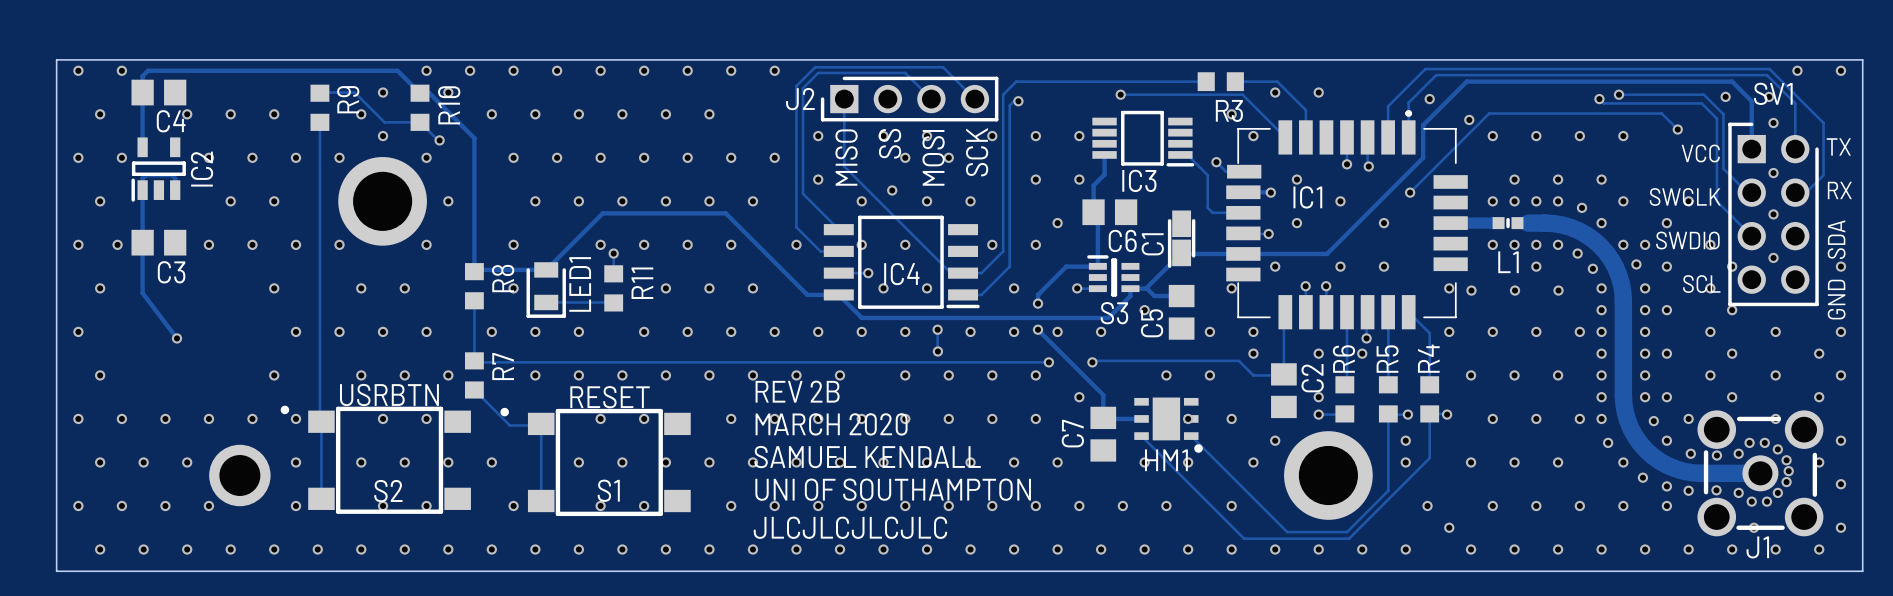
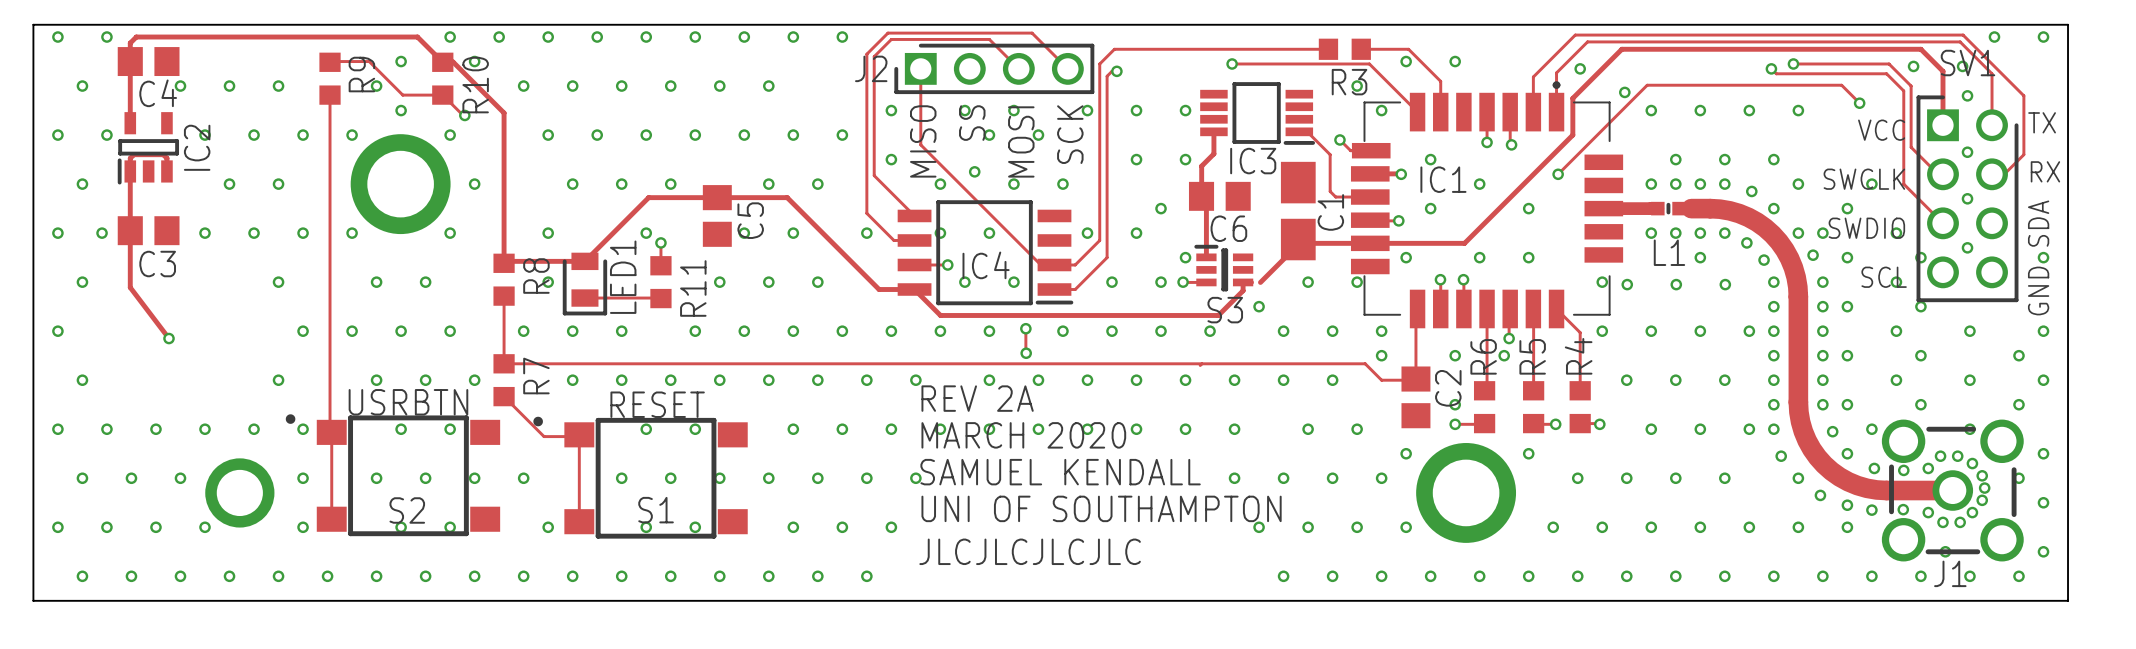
via: (665, 201) -> none
C1 footprint: [1167, 210, 1196, 268] -> [1280, 161, 1316, 261]
via: (644, 244) -> none
C1 name position: C1 (1152, 244) -> C1 (1330, 212)
via: none -> (1185, 257)
track: (1097, 266) (1066, 266) (1038, 294) (1038, 303) -> none
via: none -> (1161, 282)
track: (1137, 288) (1147, 288) (1154, 296) (1181, 296) -> none
via: none -> (1308, 282)
via: (1038, 303) -> none
C5 position: (1181, 312) -> (717, 215)
C5 name position: C5 (1152, 323) -> C5 (750, 220)
track: (1038, 329) (1103, 395) (1104, 418) (1141, 418) -> none
via: (1038, 329) -> none
via: none -> (1283, 331)
track: (474, 360) (476, 362) (1048, 362) -> (504, 363) (1201, 363)
via: (1048, 362) -> none
via: (1092, 362) -> none
via: none -> (1185, 380)
via: none -> (1234, 380)
text: REV 2B (797, 391) -> REV 2A (977, 398)
via: (1079, 397) -> none
track: (1388, 413) (1388, 490) (1347, 532) (1287, 532) (1191, 436) -> none
track: (1429, 413) (1429, 458) (1349, 538) (1244, 538) (1141, 436) -> none
via: none -> (1185, 429)
via: none -> (1234, 429)
text position: MARCH 2020 (831, 424) -> MARCH 2020 (1023, 435)
HM1: (1168, 425) -> none
C7: (1103, 434) -> none
via: none -> (1528, 453)
via: (1405, 440) -> none
text position: SAMUEL KENDALL (867, 457) -> SAMUEL KENDALL (1060, 472)
via: (883, 462) -> none
via: (927, 462) -> none
via: (970, 462) -> none
via: (1014, 462) -> none
via: (1057, 462) -> none
via: none -> (1234, 478)
via: (1144, 462) -> none
via: none -> (1283, 478)
via: (1188, 462) -> none
via: none -> (1332, 478)
via: (1405, 462) -> none
via: none -> (1577, 478)
text position: UNI OF SOUTHAMPTON (893, 489) -> UNI OF SOUTHAMPTON (1101, 508)
via: (861, 505) -> none
via: (905, 505) -> none
via: (948, 505) -> none
via: (992, 505) -> none
via: (1035, 505) -> none
via: (1079, 505) -> none
via: (1122, 505) -> none
via: none -> (1259, 527)
via: (1166, 505) -> none
via: none -> (1308, 527)
via: none -> (1406, 527)
via: none -> (1553, 527)
via: (1427, 505) -> none
via: none -> (1602, 527)
text position: JLCJLCJLCJLC (850, 527) -> JLCJLCJLCJLC (1030, 551)
via: (1449, 527) -> none
via: (839, 549) -> none
via: (883, 549) -> none
via: (927, 549) -> none
via: (970, 549) -> none
via: (1014, 549) -> none
via: (1057, 549) -> none
via: (1101, 549) -> none
via: (1144, 549) -> none
via: none -> (1283, 576)
via: (1188, 549) -> none
via: none -> (1332, 576)
via: (1231, 549) -> none
via: none -> (1381, 576)
via: (1275, 549) -> none
via: none -> (1430, 576)
via: (1318, 549) -> none
via: none -> (1479, 576)
via: (1362, 549) -> none
via: none -> (1528, 576)
via: (1405, 549) -> none
via: none -> (1577, 576)

